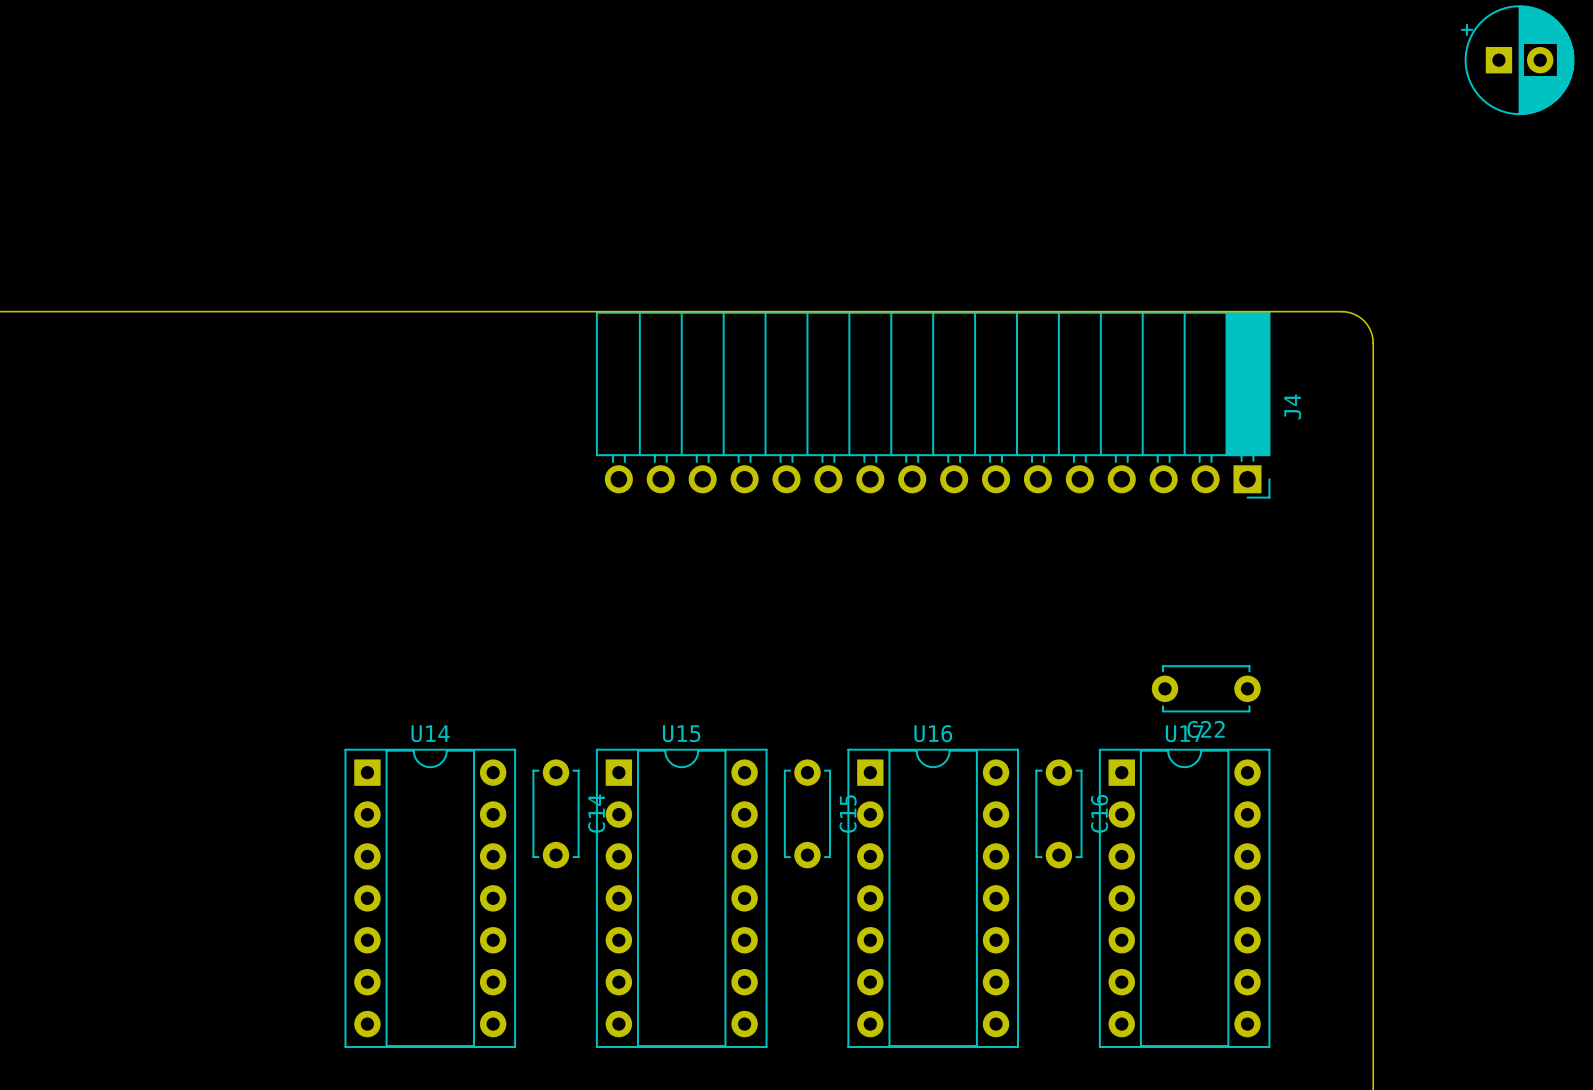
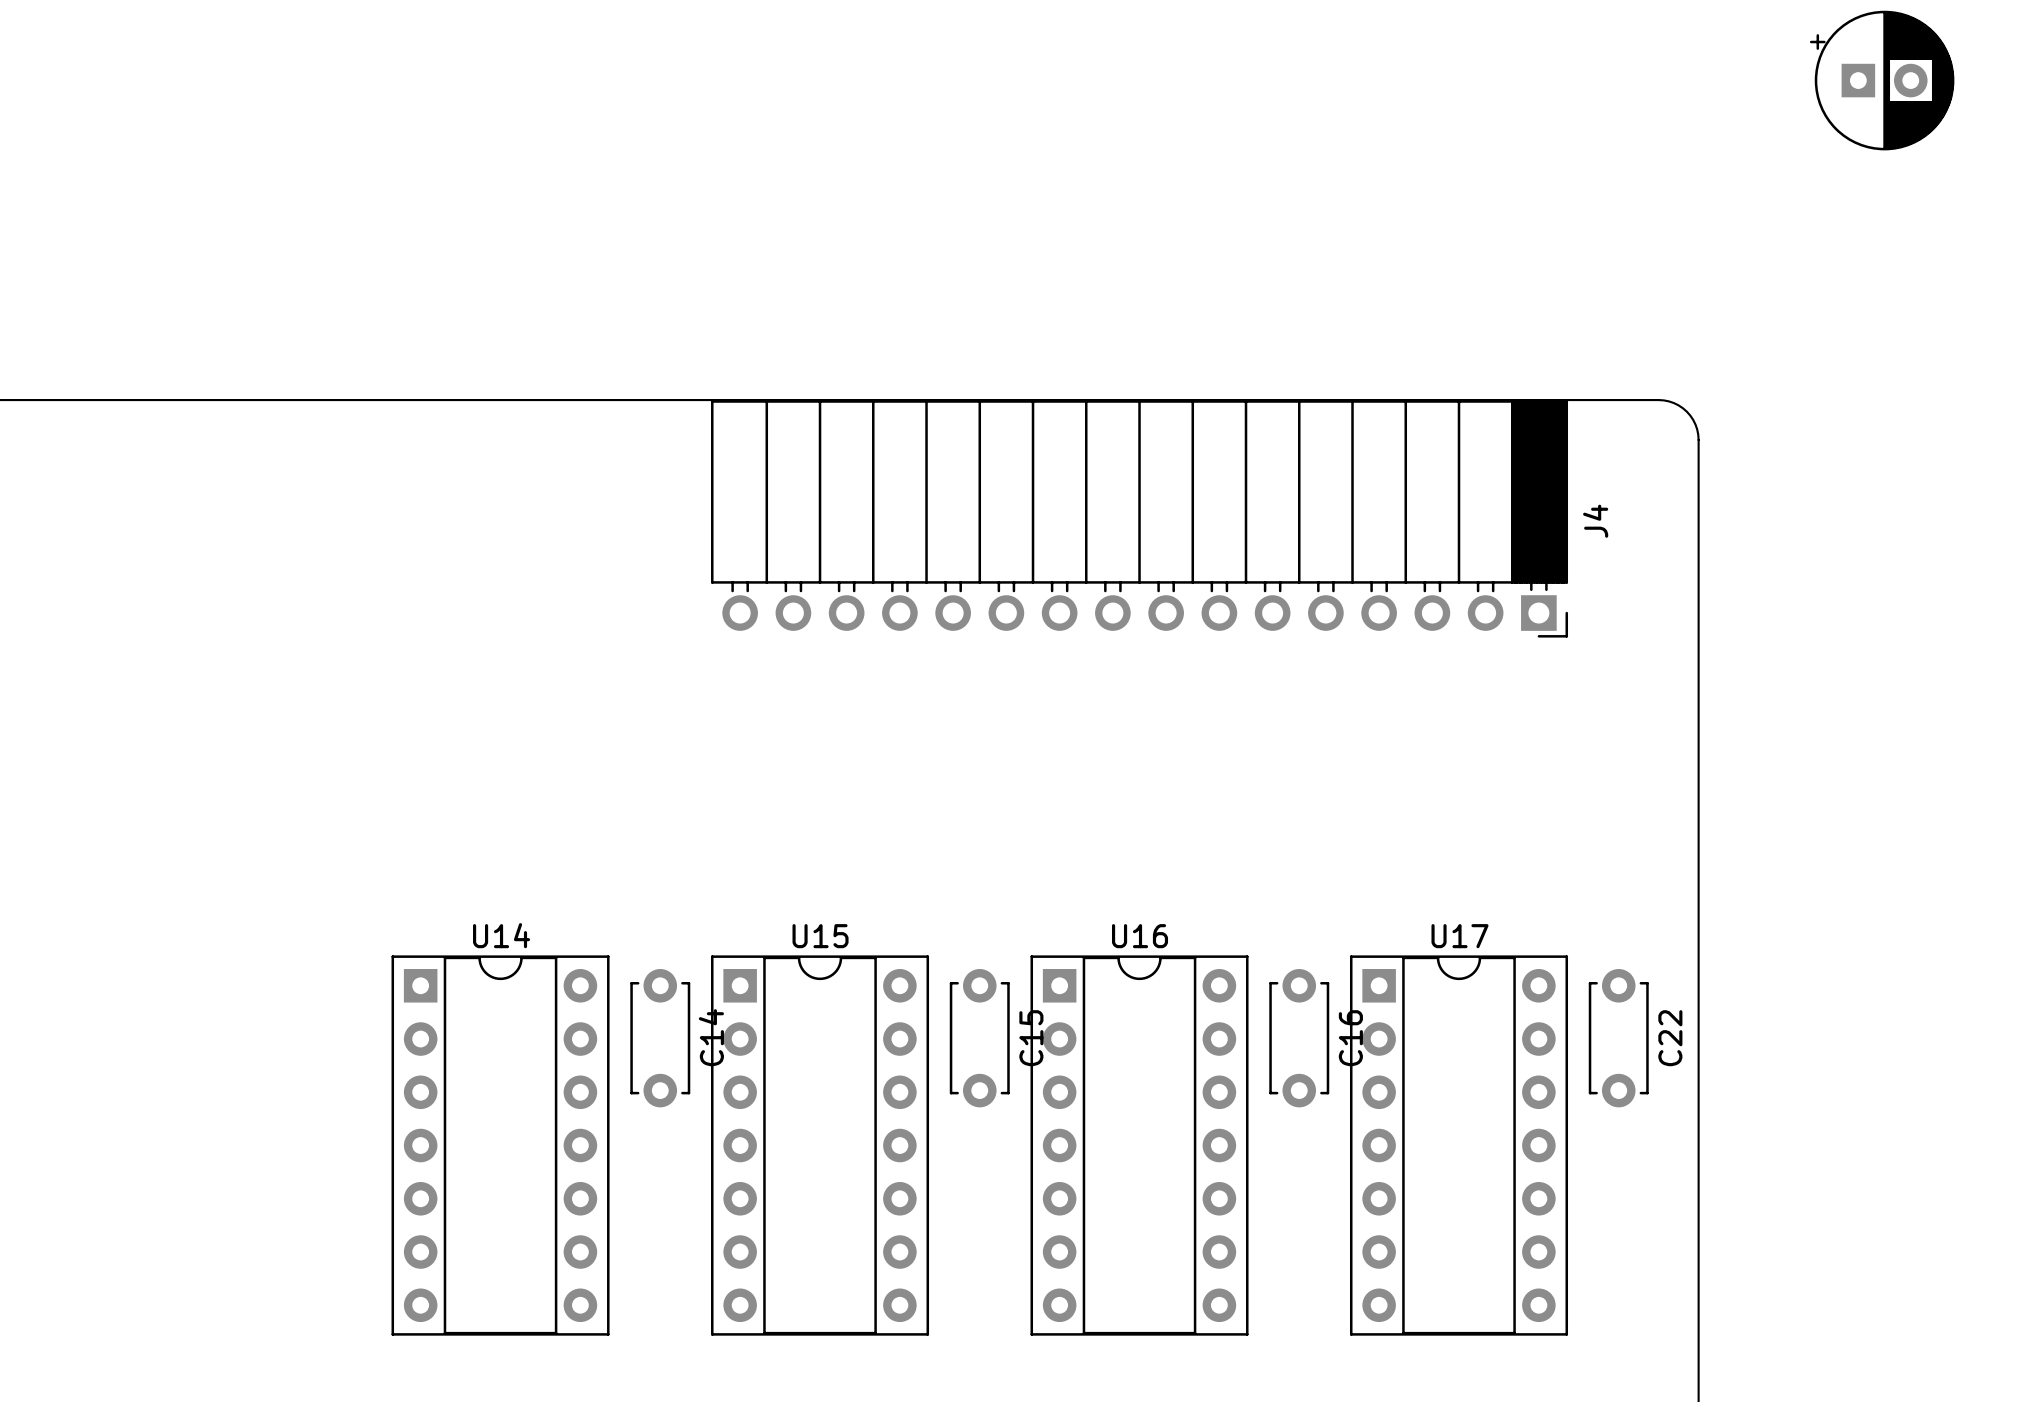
C22 rotation: 0° (1206, 688) -> 90° clockwise (1618, 1038)
C22 position: (1206, 688) -> (1618, 1038)
C22 name position: C22 (1206, 729) -> C22 (1670, 1038)

